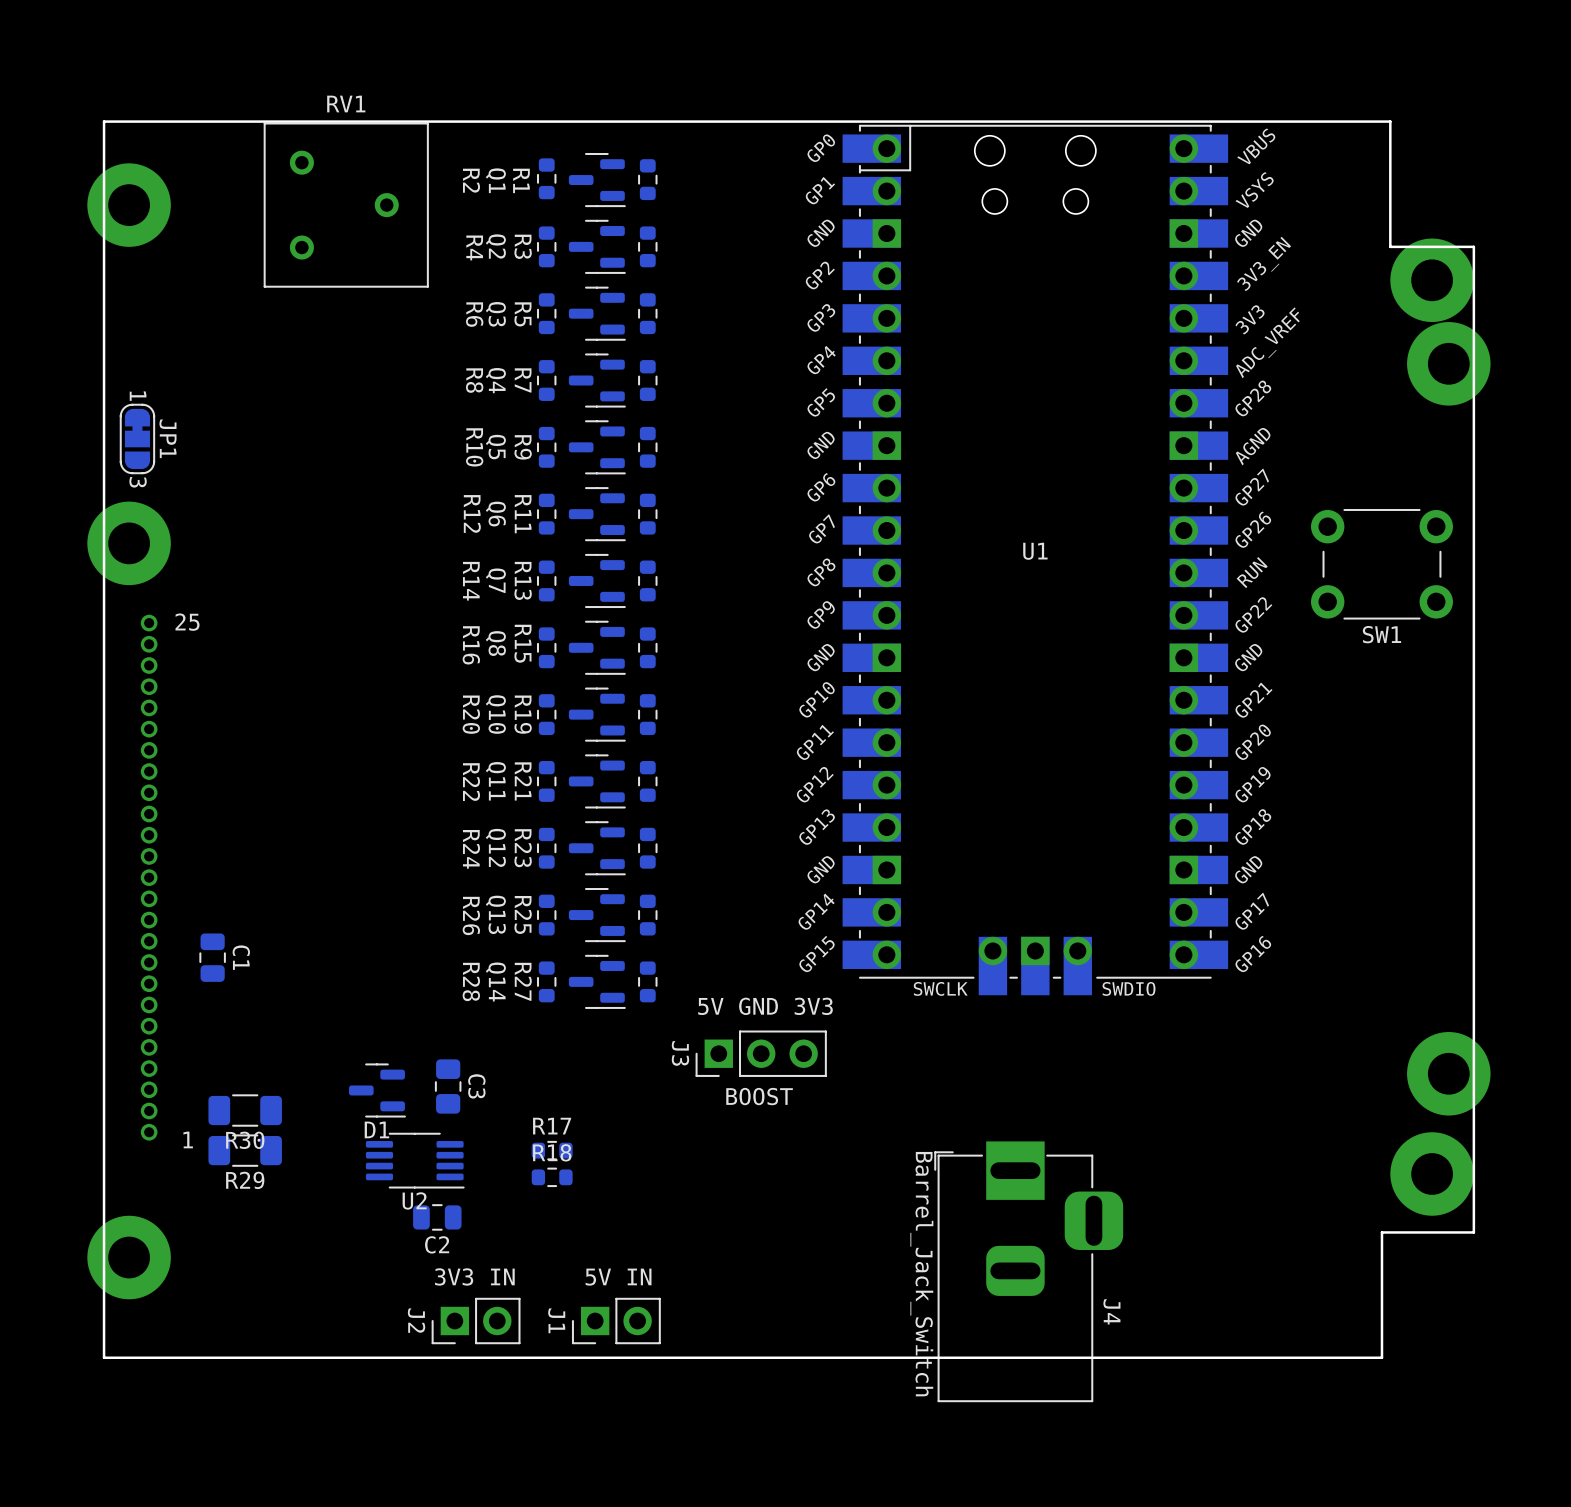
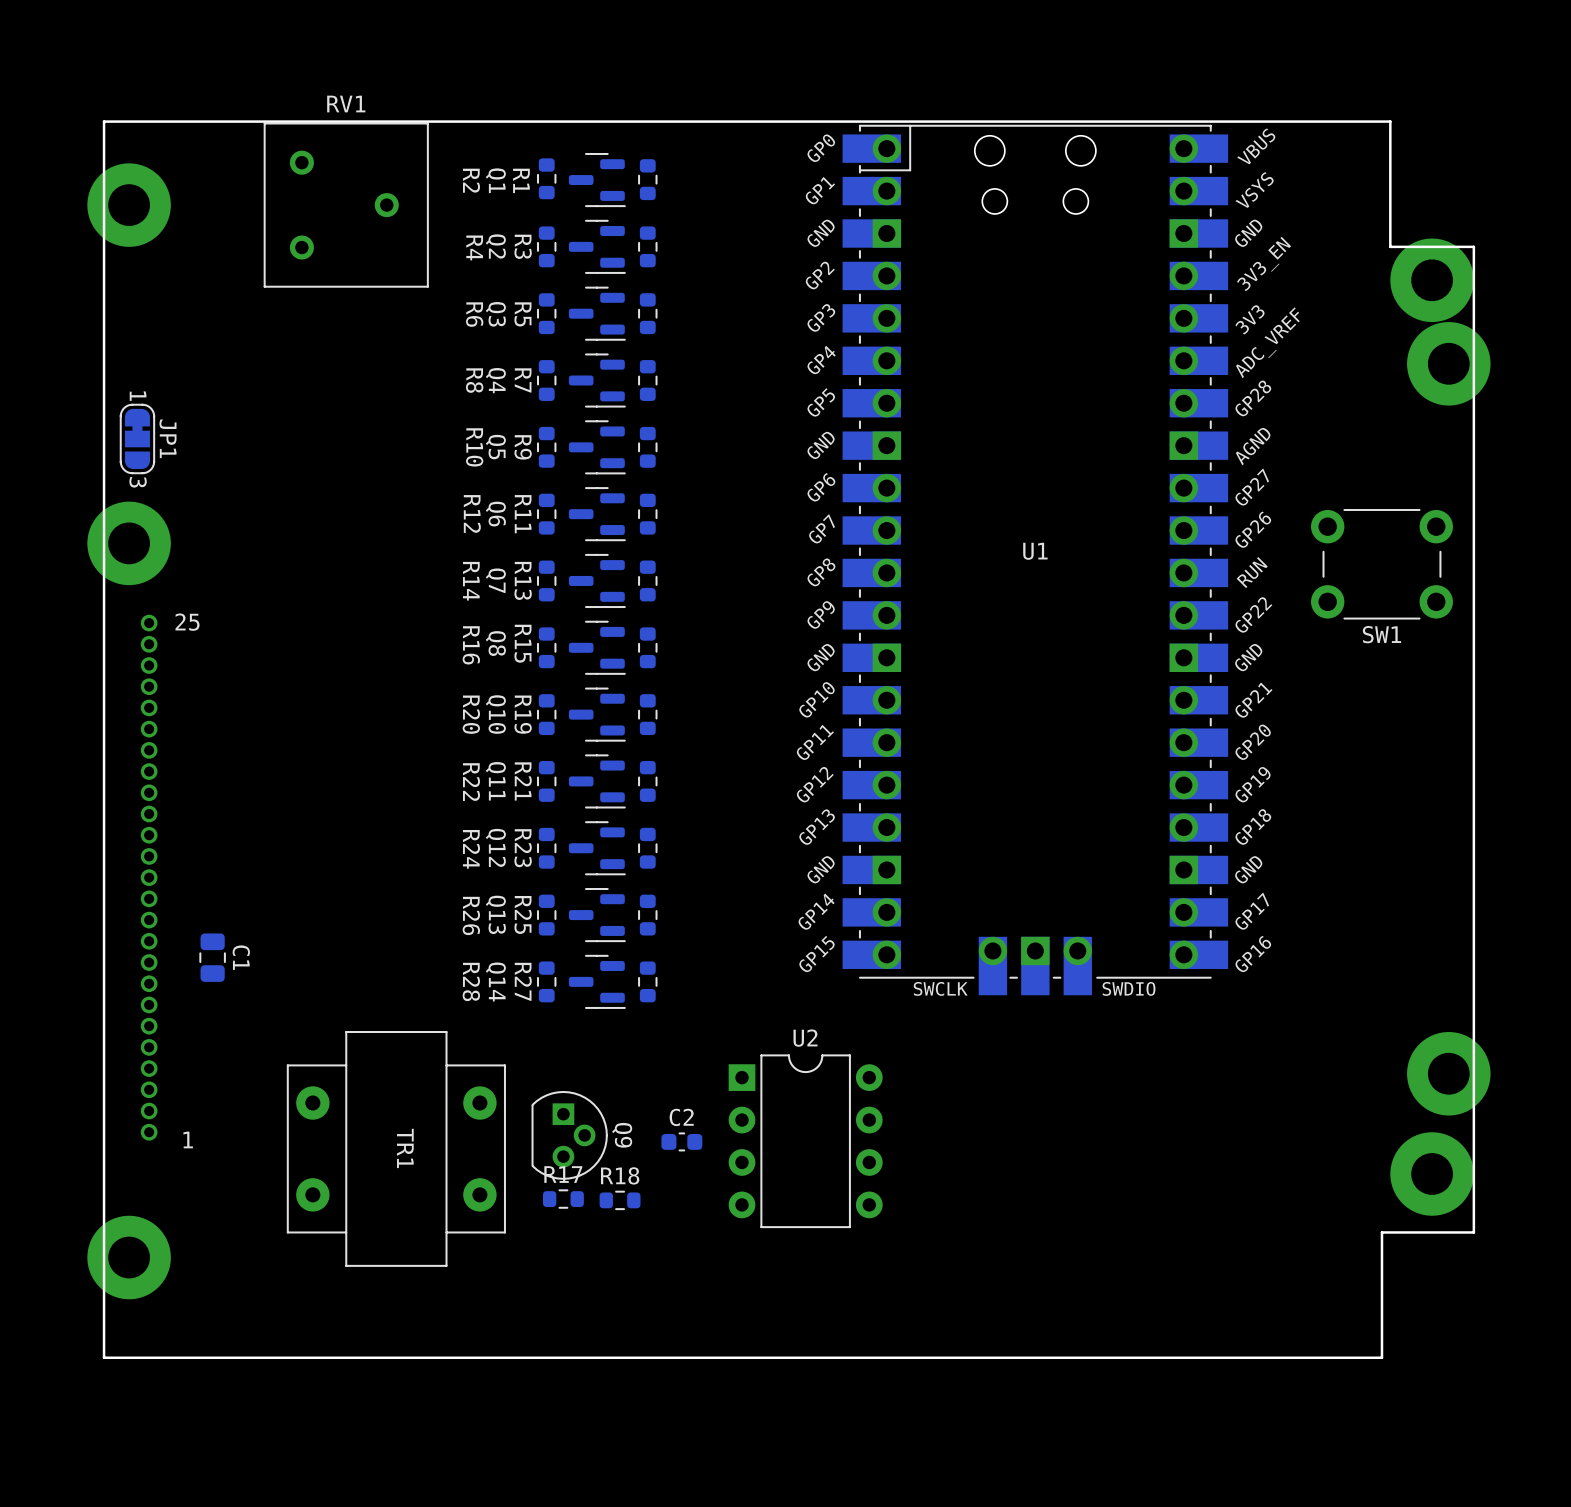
text: 5V GND 3V3 (765, 1006) -> none
J3: BOOST (761, 1053) -> none
C3: (448, 1086) -> none
D1: (377, 1090) -> none
R30: (245, 1110) -> none
U2 footprint: [365, 1132, 465, 1189] -> [728, 1054, 883, 1229]
Q9: none -> (569, 1135)
TR1: none -> (396, 1148)
R29: (245, 1150) -> none
R17 position: (552, 1150) -> (563, 1199)
R18 position: (552, 1177) -> (620, 1200)
U2 name position: U2 (414, 1200) -> U2 (805, 1038)
C2 footprint: [413, 1204, 462, 1231] -> [661, 1132, 703, 1152]
C2 name position: C2 (437, 1244) -> C2 (681, 1117)
J4: Barrel_Jack_Switch (1028, 1271) -> none
J2: 3V3 IN (476, 1321) -> none
J1: 5V IN (616, 1321) -> none

